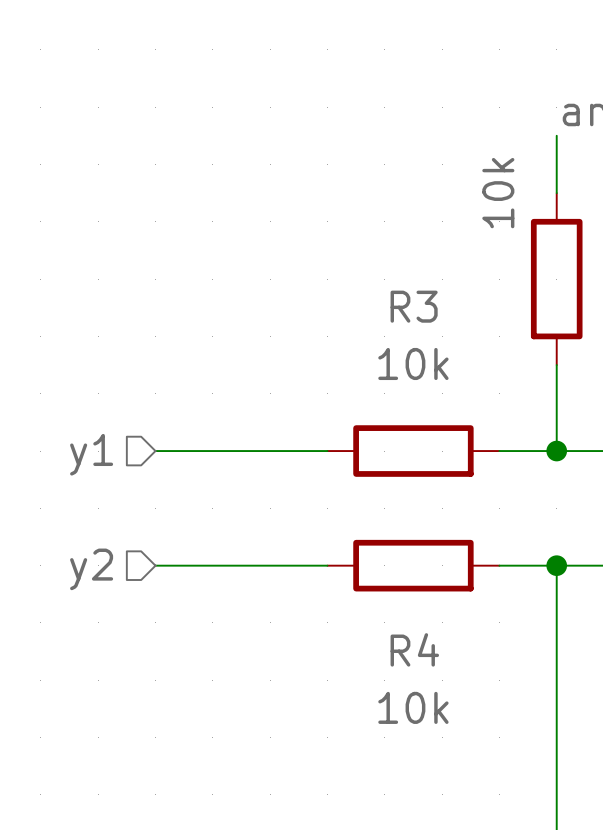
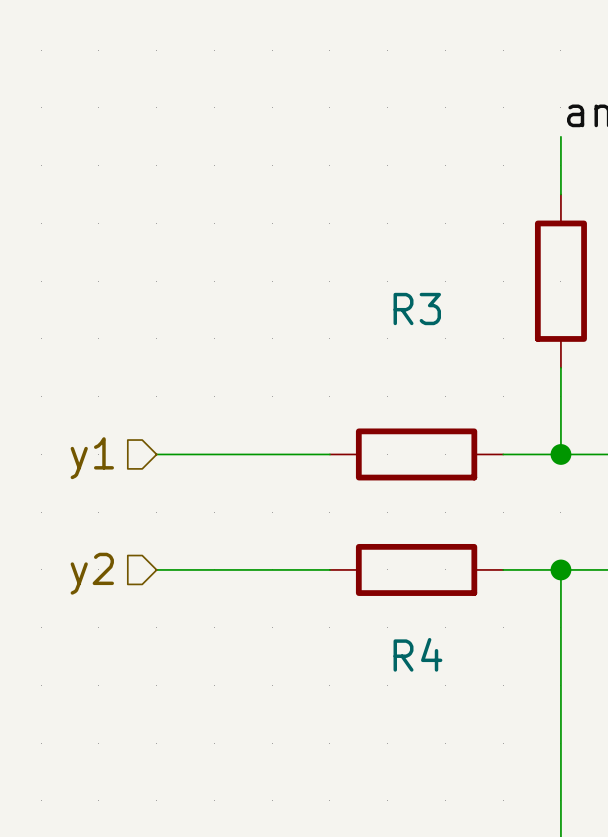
part value: 10k (498, 193) -> none
R3 value: 10k (413, 363) -> none
R4 value: 10k (413, 707) -> none

